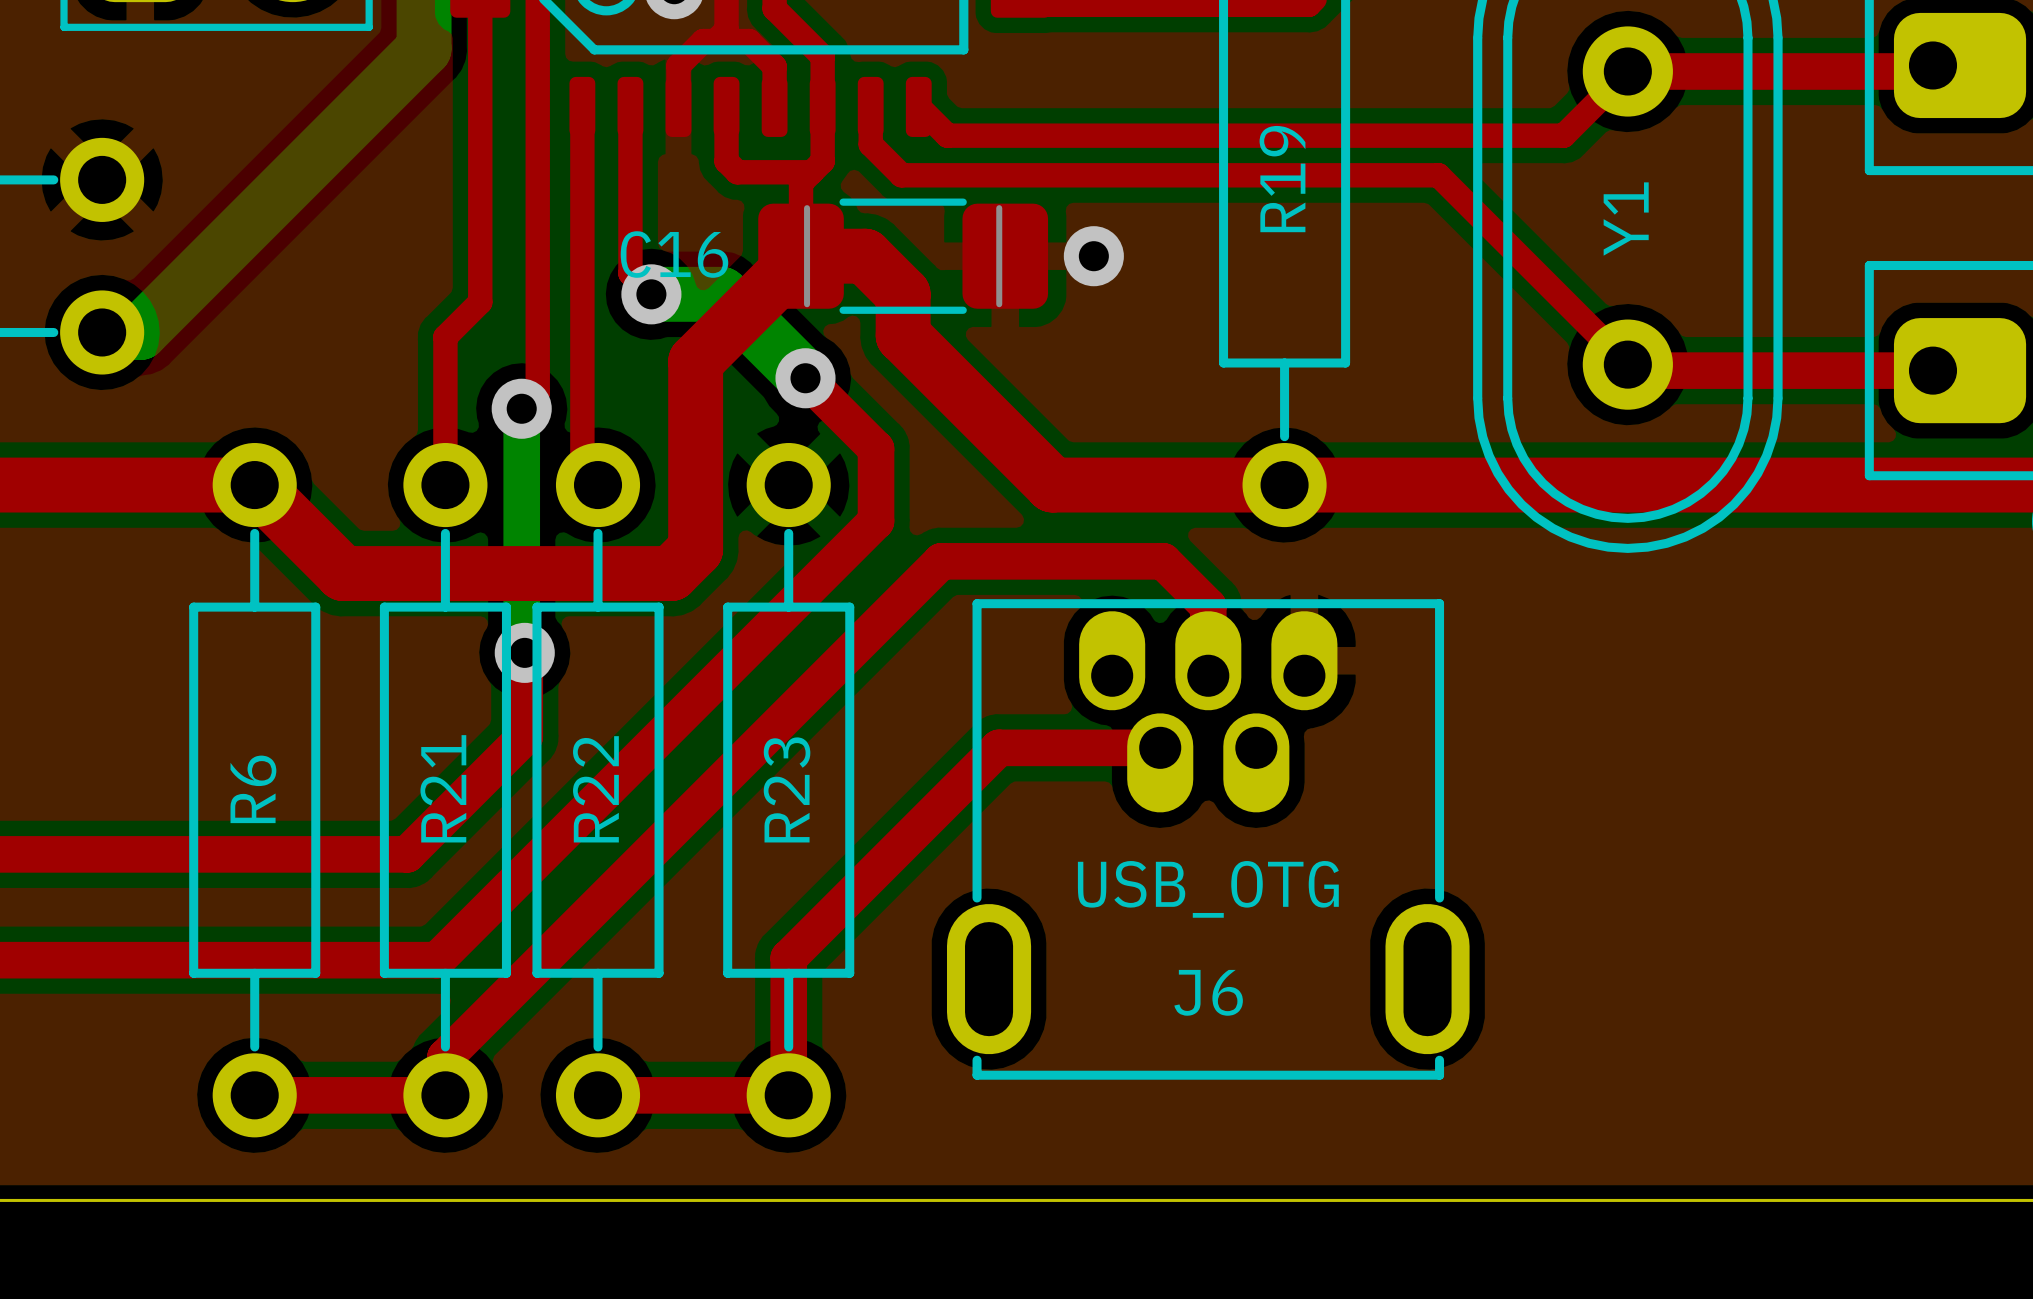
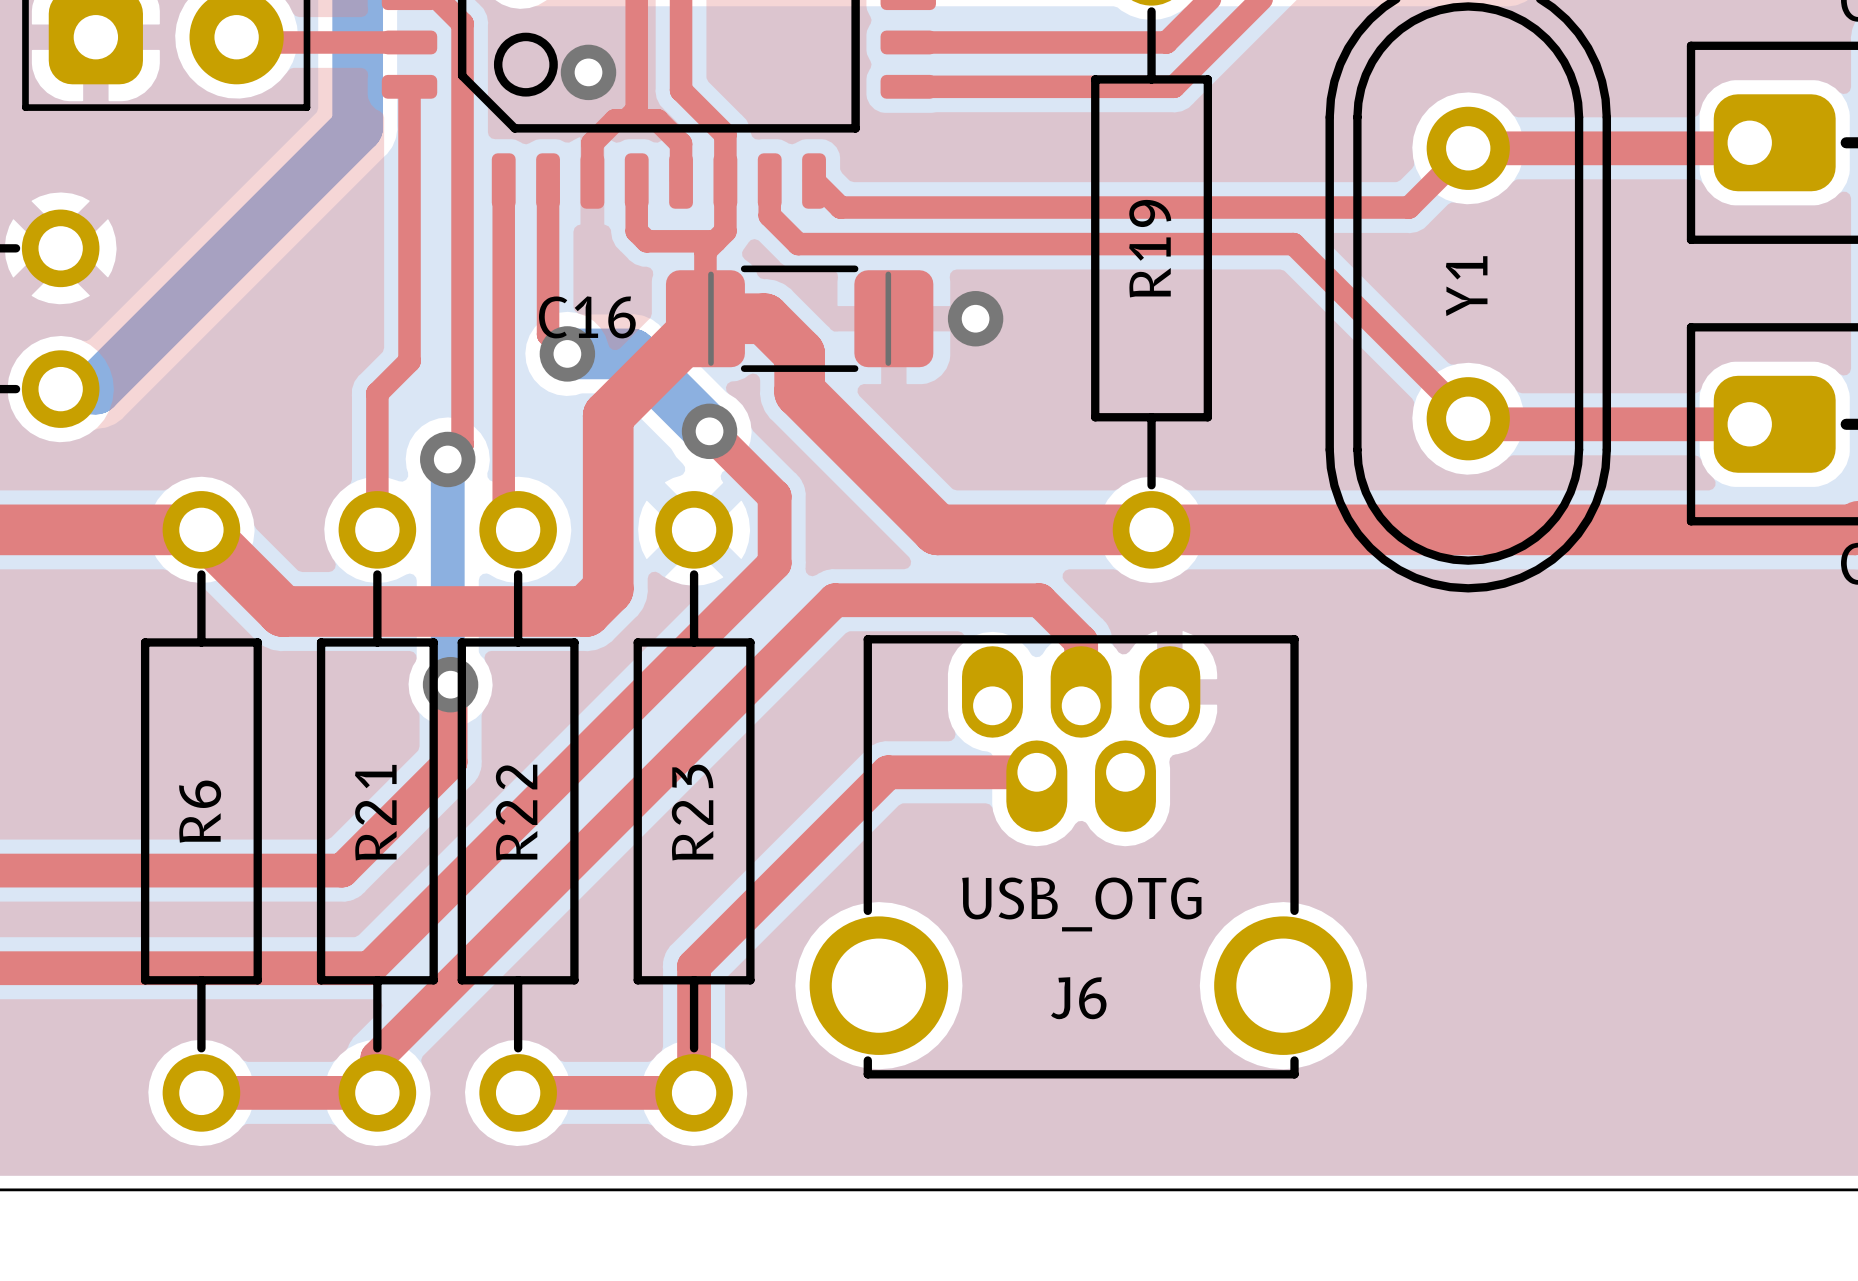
J6 footprint: [946, 599, 1470, 1080] -> [809, 635, 1353, 1079]

